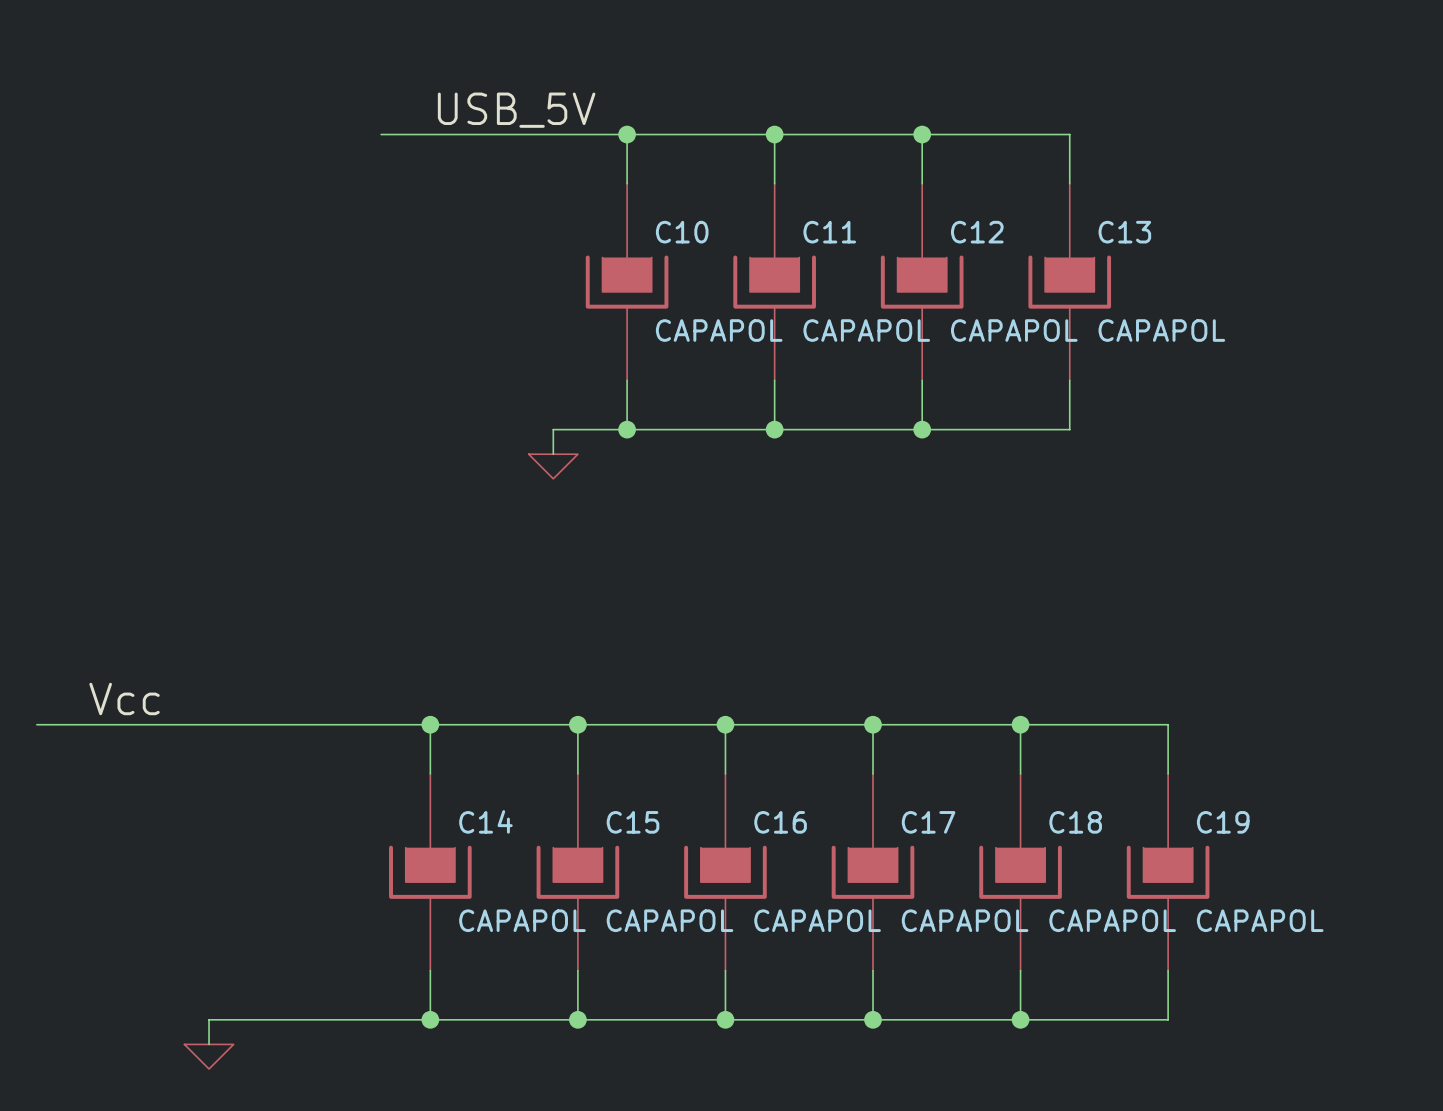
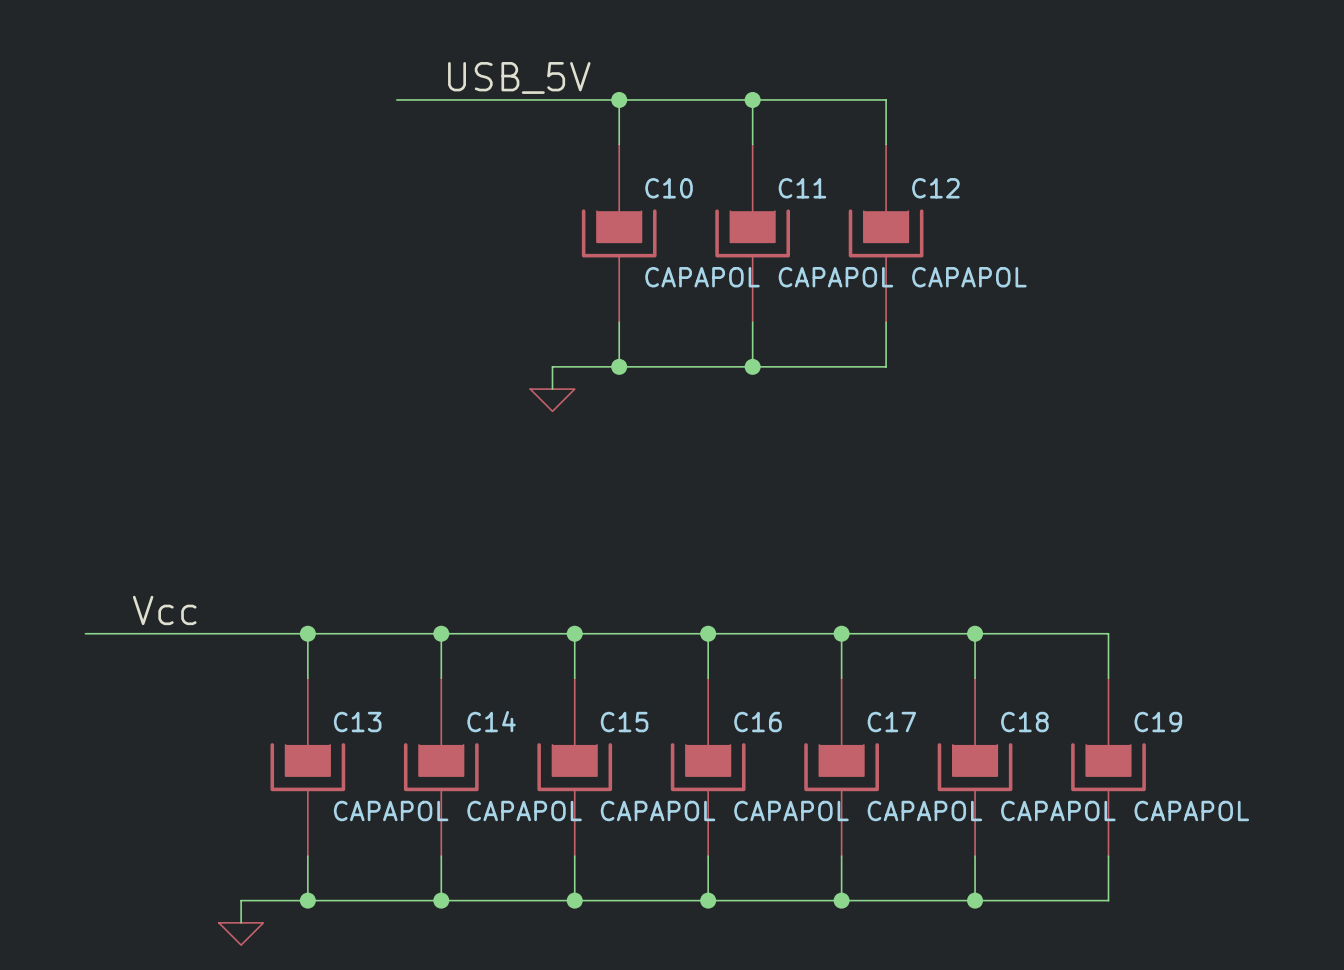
wire: (922, 134) (1069, 134) (1069, 183) -> none
junction: (922, 134) -> none
C13 position: (1069, 282) -> (307, 767)
wire: (1069, 380) (1069, 429) (922, 429) -> none
junction: (922, 429) -> none
wire: none -> (307, 633) (307, 678)
junction: none -> (307, 633)
wire: none -> (307, 856) (307, 900)
junction: none -> (307, 900)

